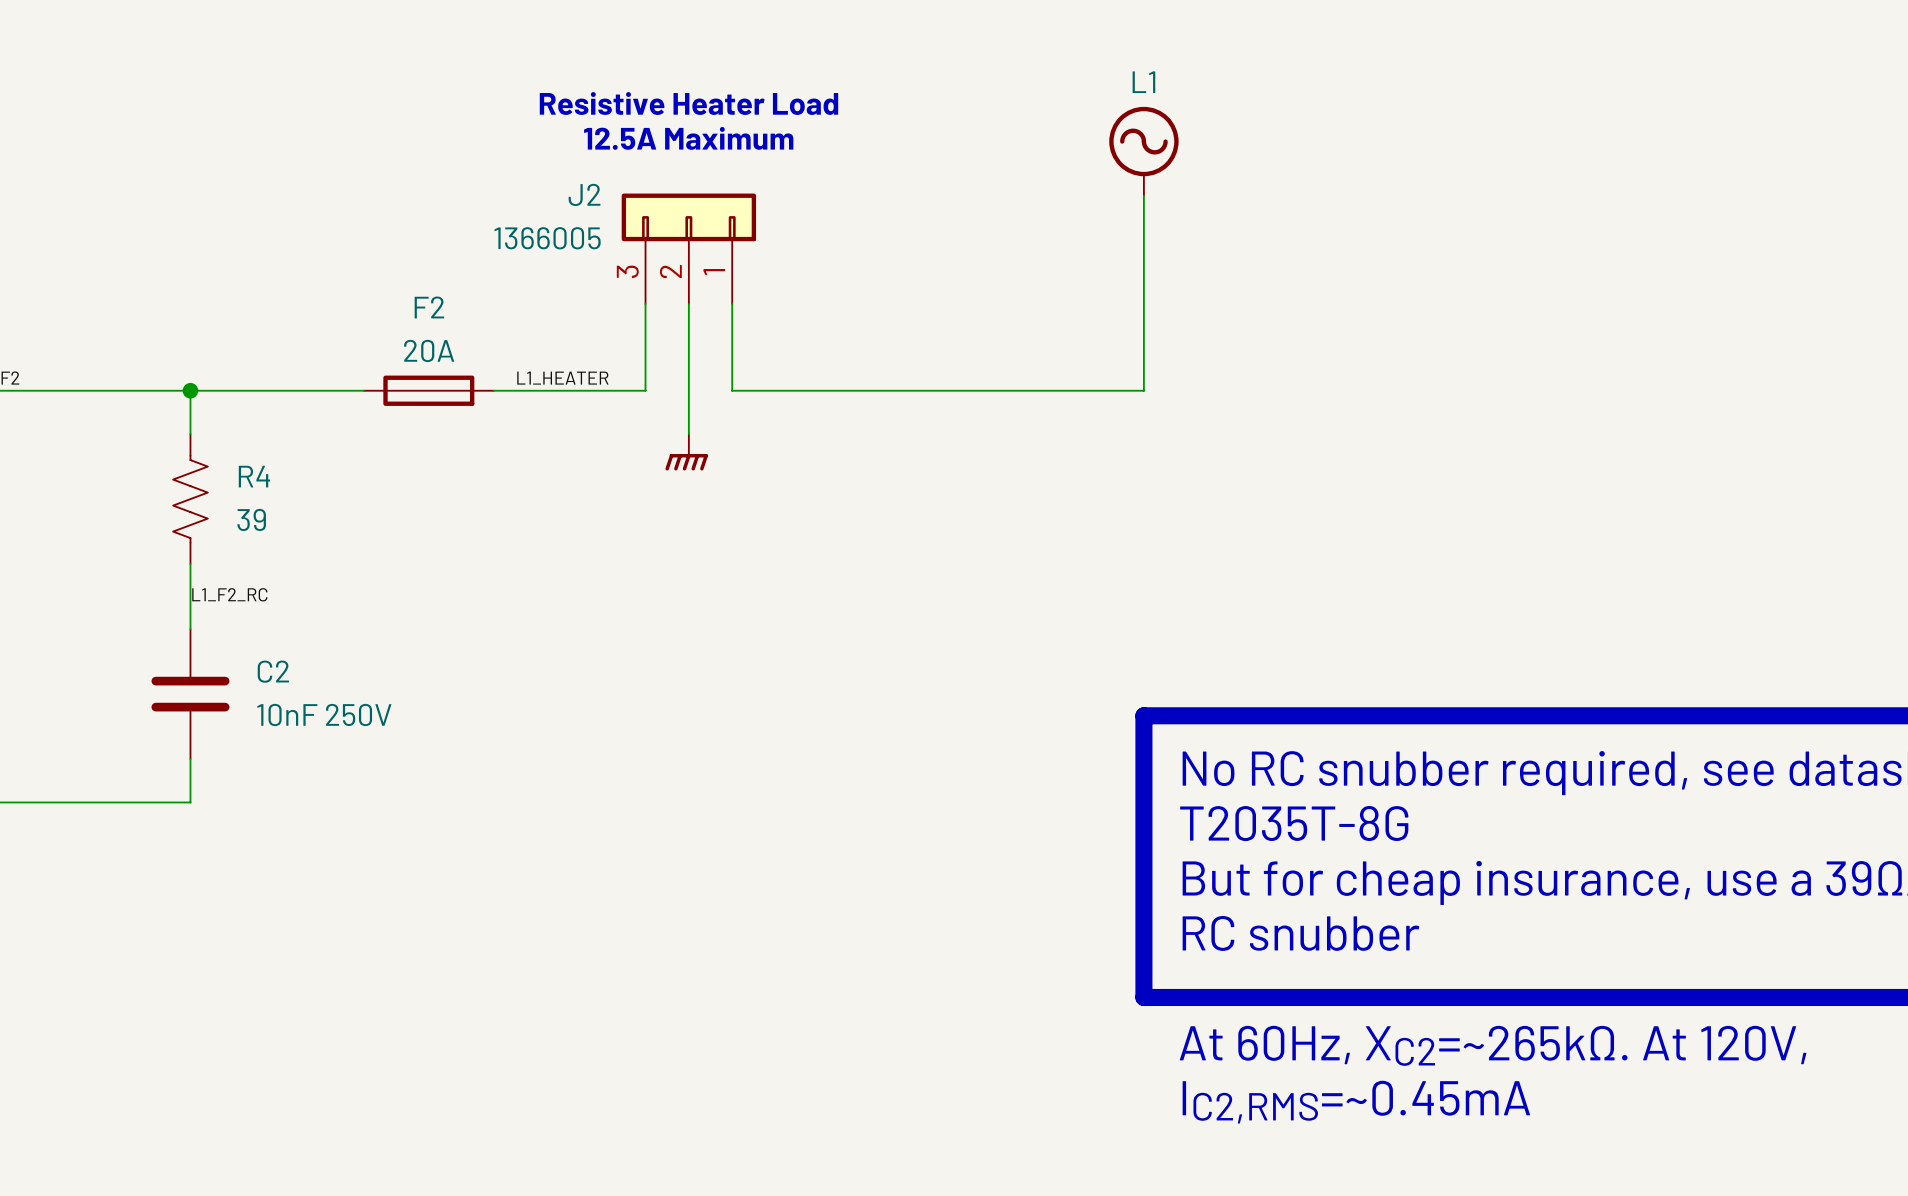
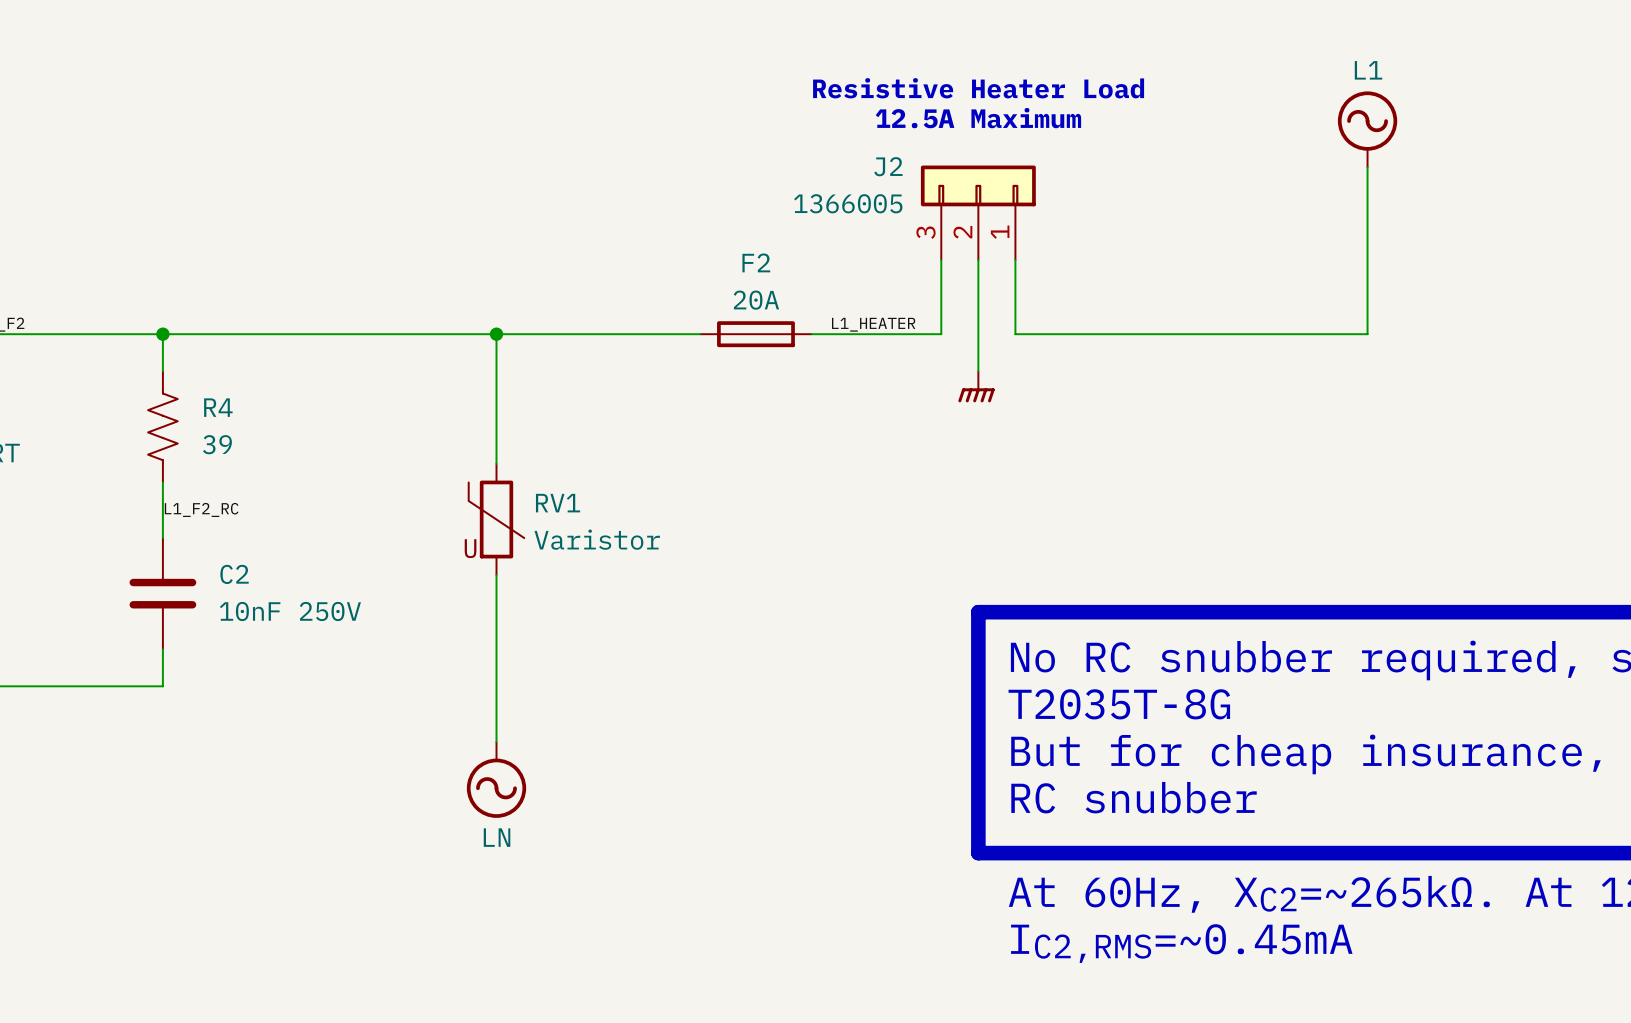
text: Resistive Heater Load (688, 103) -> none
text: none -> Resistive Heater Load (978, 88)
text: 12.5A Maximum (688, 138) -> none
text: none -> 12.5A Maximum (978, 118)
power symbol: L1 (1143, 151) -> none
power symbol: none -> L1 (1367, 129)
wire: none -> (1367, 167) (1367, 334) (1015, 334) (1015, 260)
J2 position: (688, 248) -> (978, 212)
wire: (645, 304) (645, 390) -> (626, 334) (552, 334)
wire: (688, 304) (688, 434) -> none
wire: (732, 304) (732, 390) -> (941, 260) (941, 334)
label: L1_HEATER (562, 378) -> none
label: none -> L1_HEATER (873, 324)
F2 position: (428, 390) -> (755, 334)
wire: none -> (496, 334) (496, 463)
junction: none -> (496, 334)
wire: (1100, 390) (1143, 390) -> (978, 371) (978, 334)
power symbol: (686, 452) -> none
power symbol: none -> (976, 386)
RV1: none -> Varistor (496, 519)
wire: none -> (496, 575) (496, 741)
power symbol: none -> LN (496, 779)

